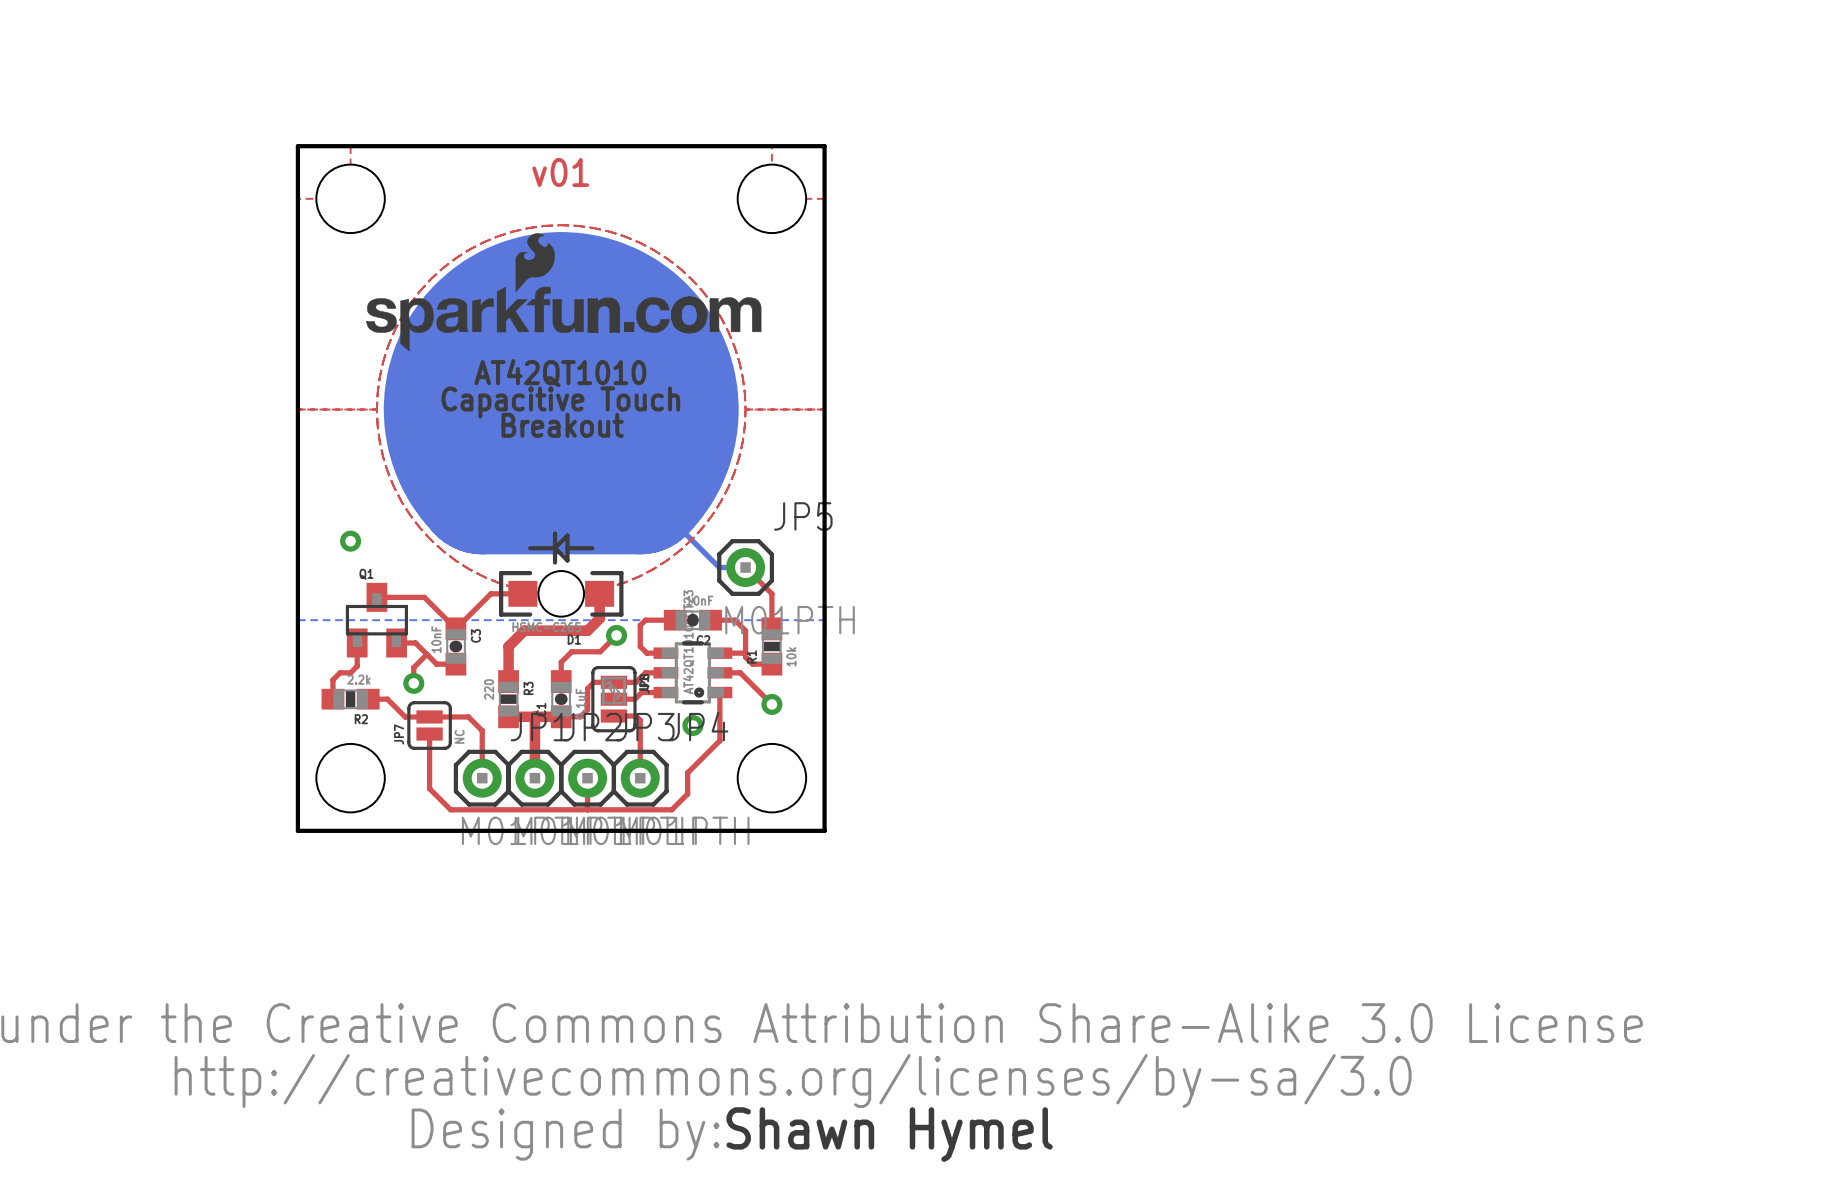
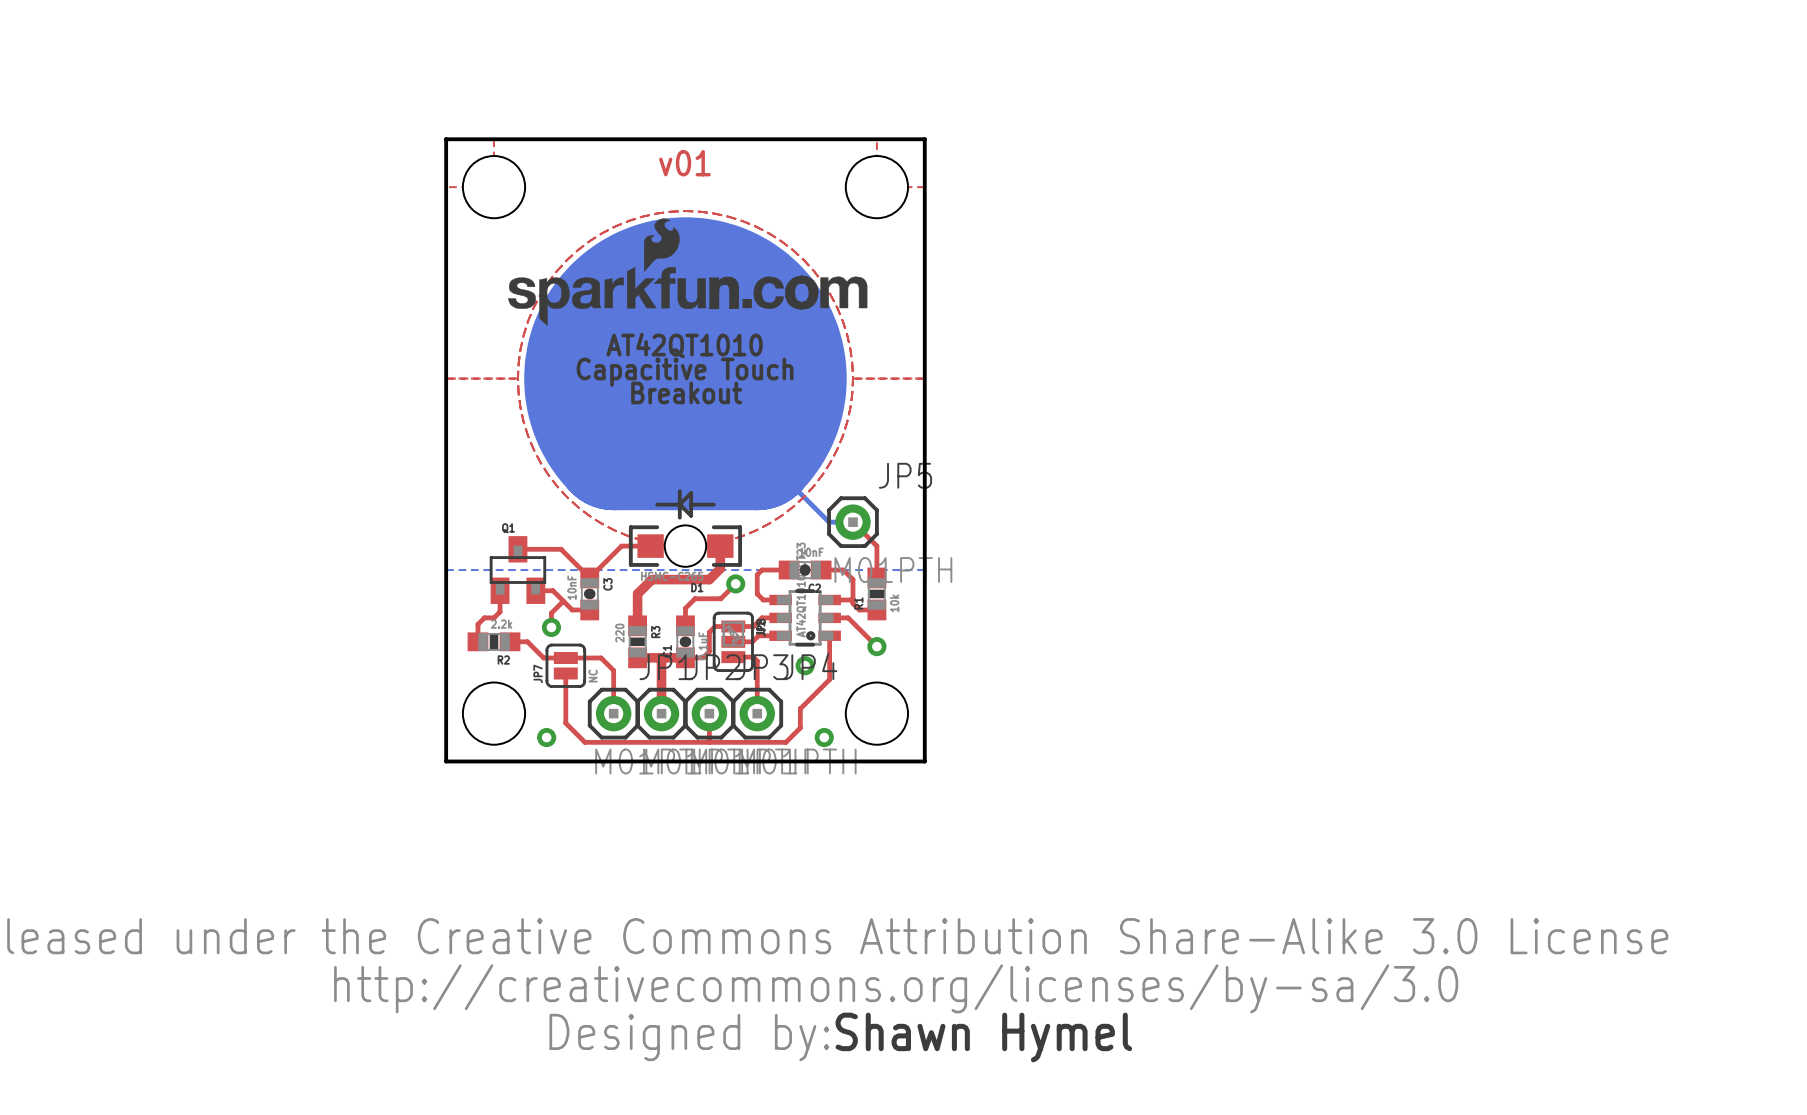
via: (350, 541) -> none
via: none -> (546, 737)
via: none -> (824, 737)

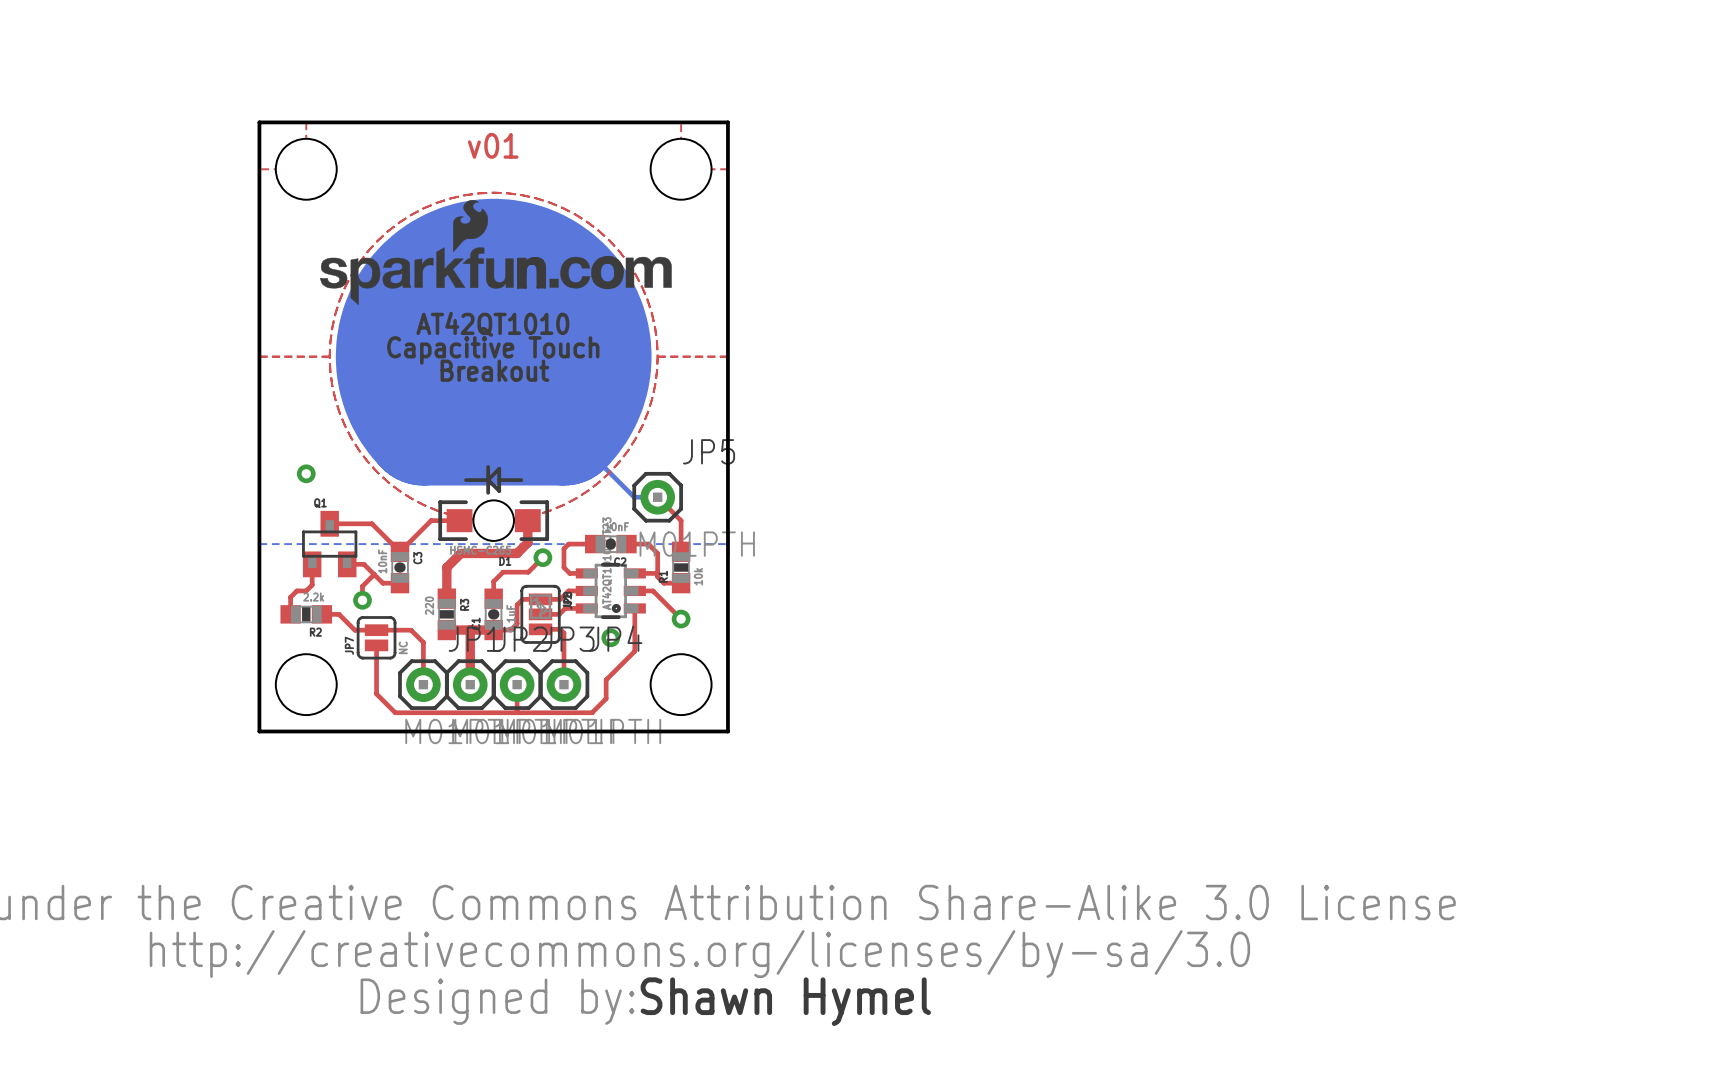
via: none -> (306, 473)
via: (546, 737) -> none
via: (824, 737) -> none

